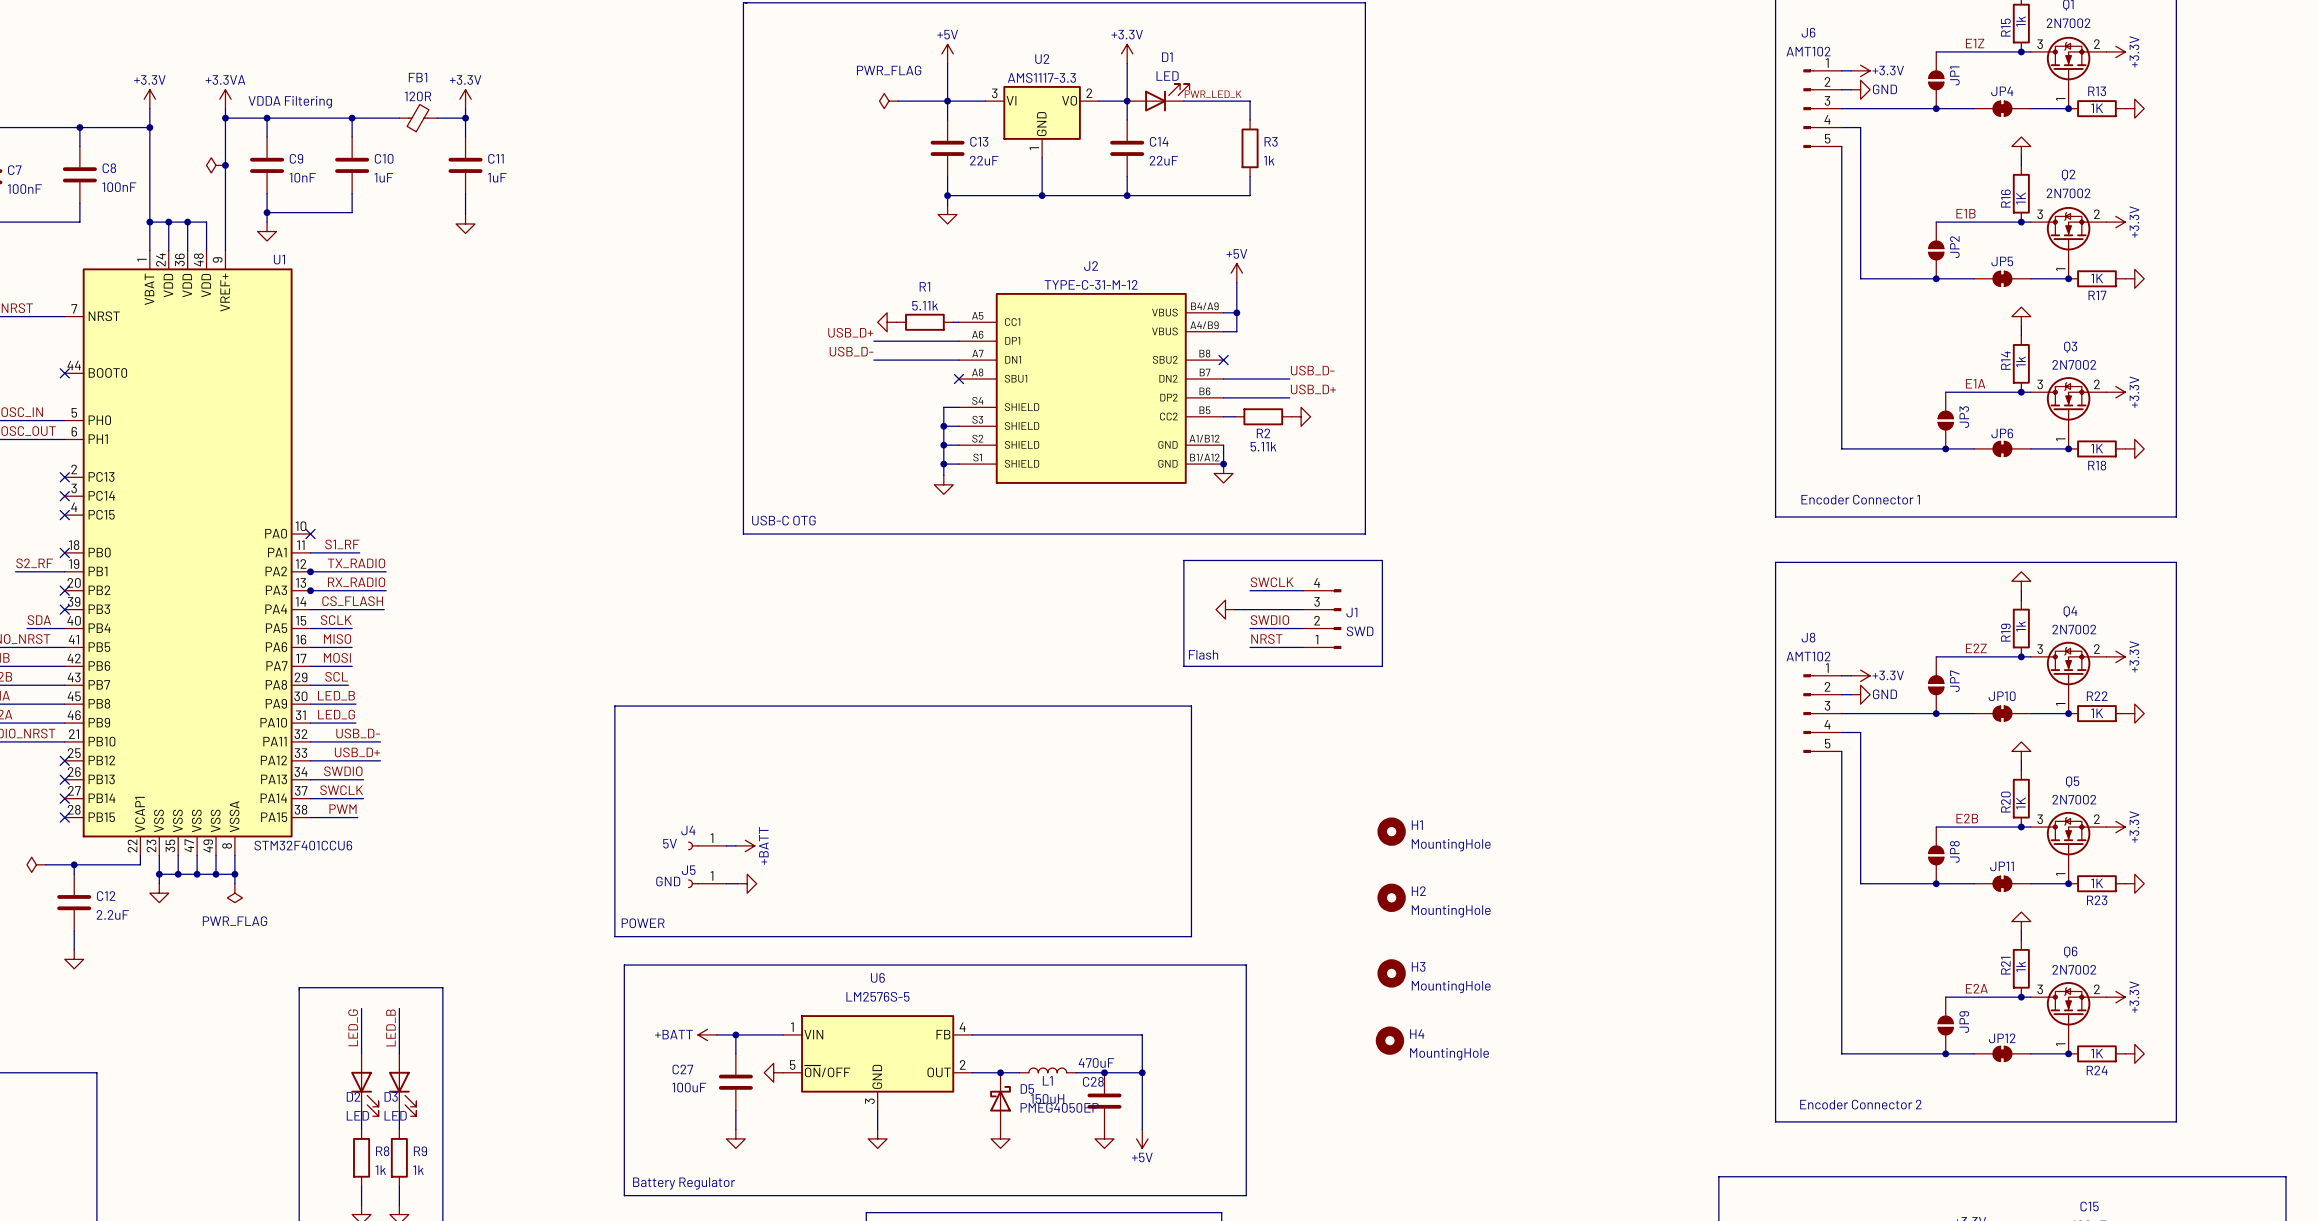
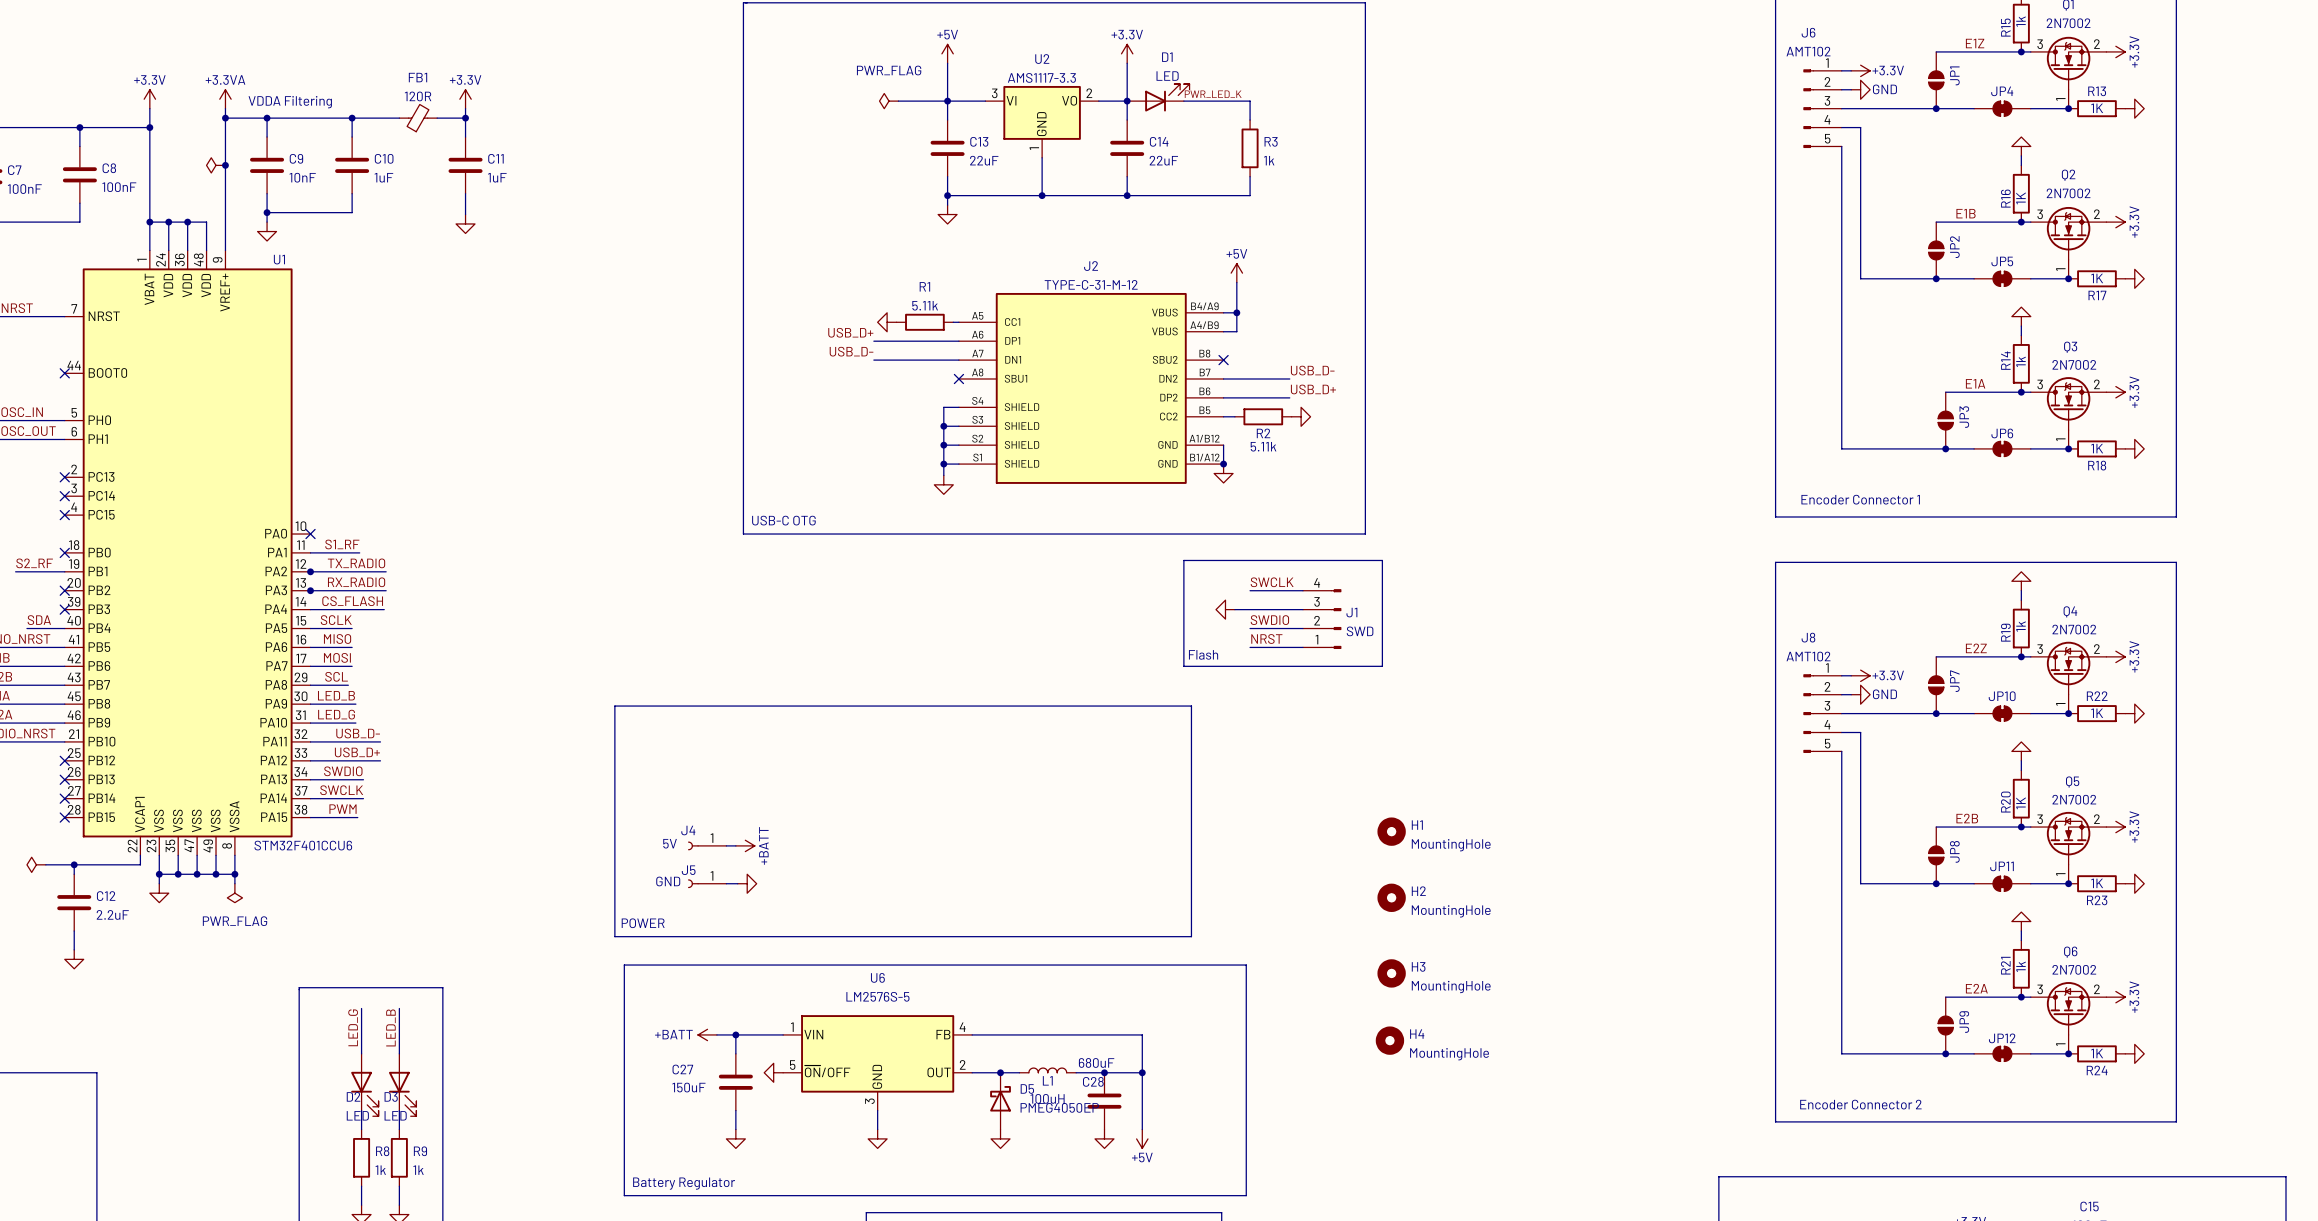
C28 value: 470uF (1096, 1062) -> 680uF (1096, 1062)
C27 value: 100uF (689, 1087) -> 150uF (688, 1087)
L1 value: 150uH (1047, 1098) -> 100uH (1047, 1098)

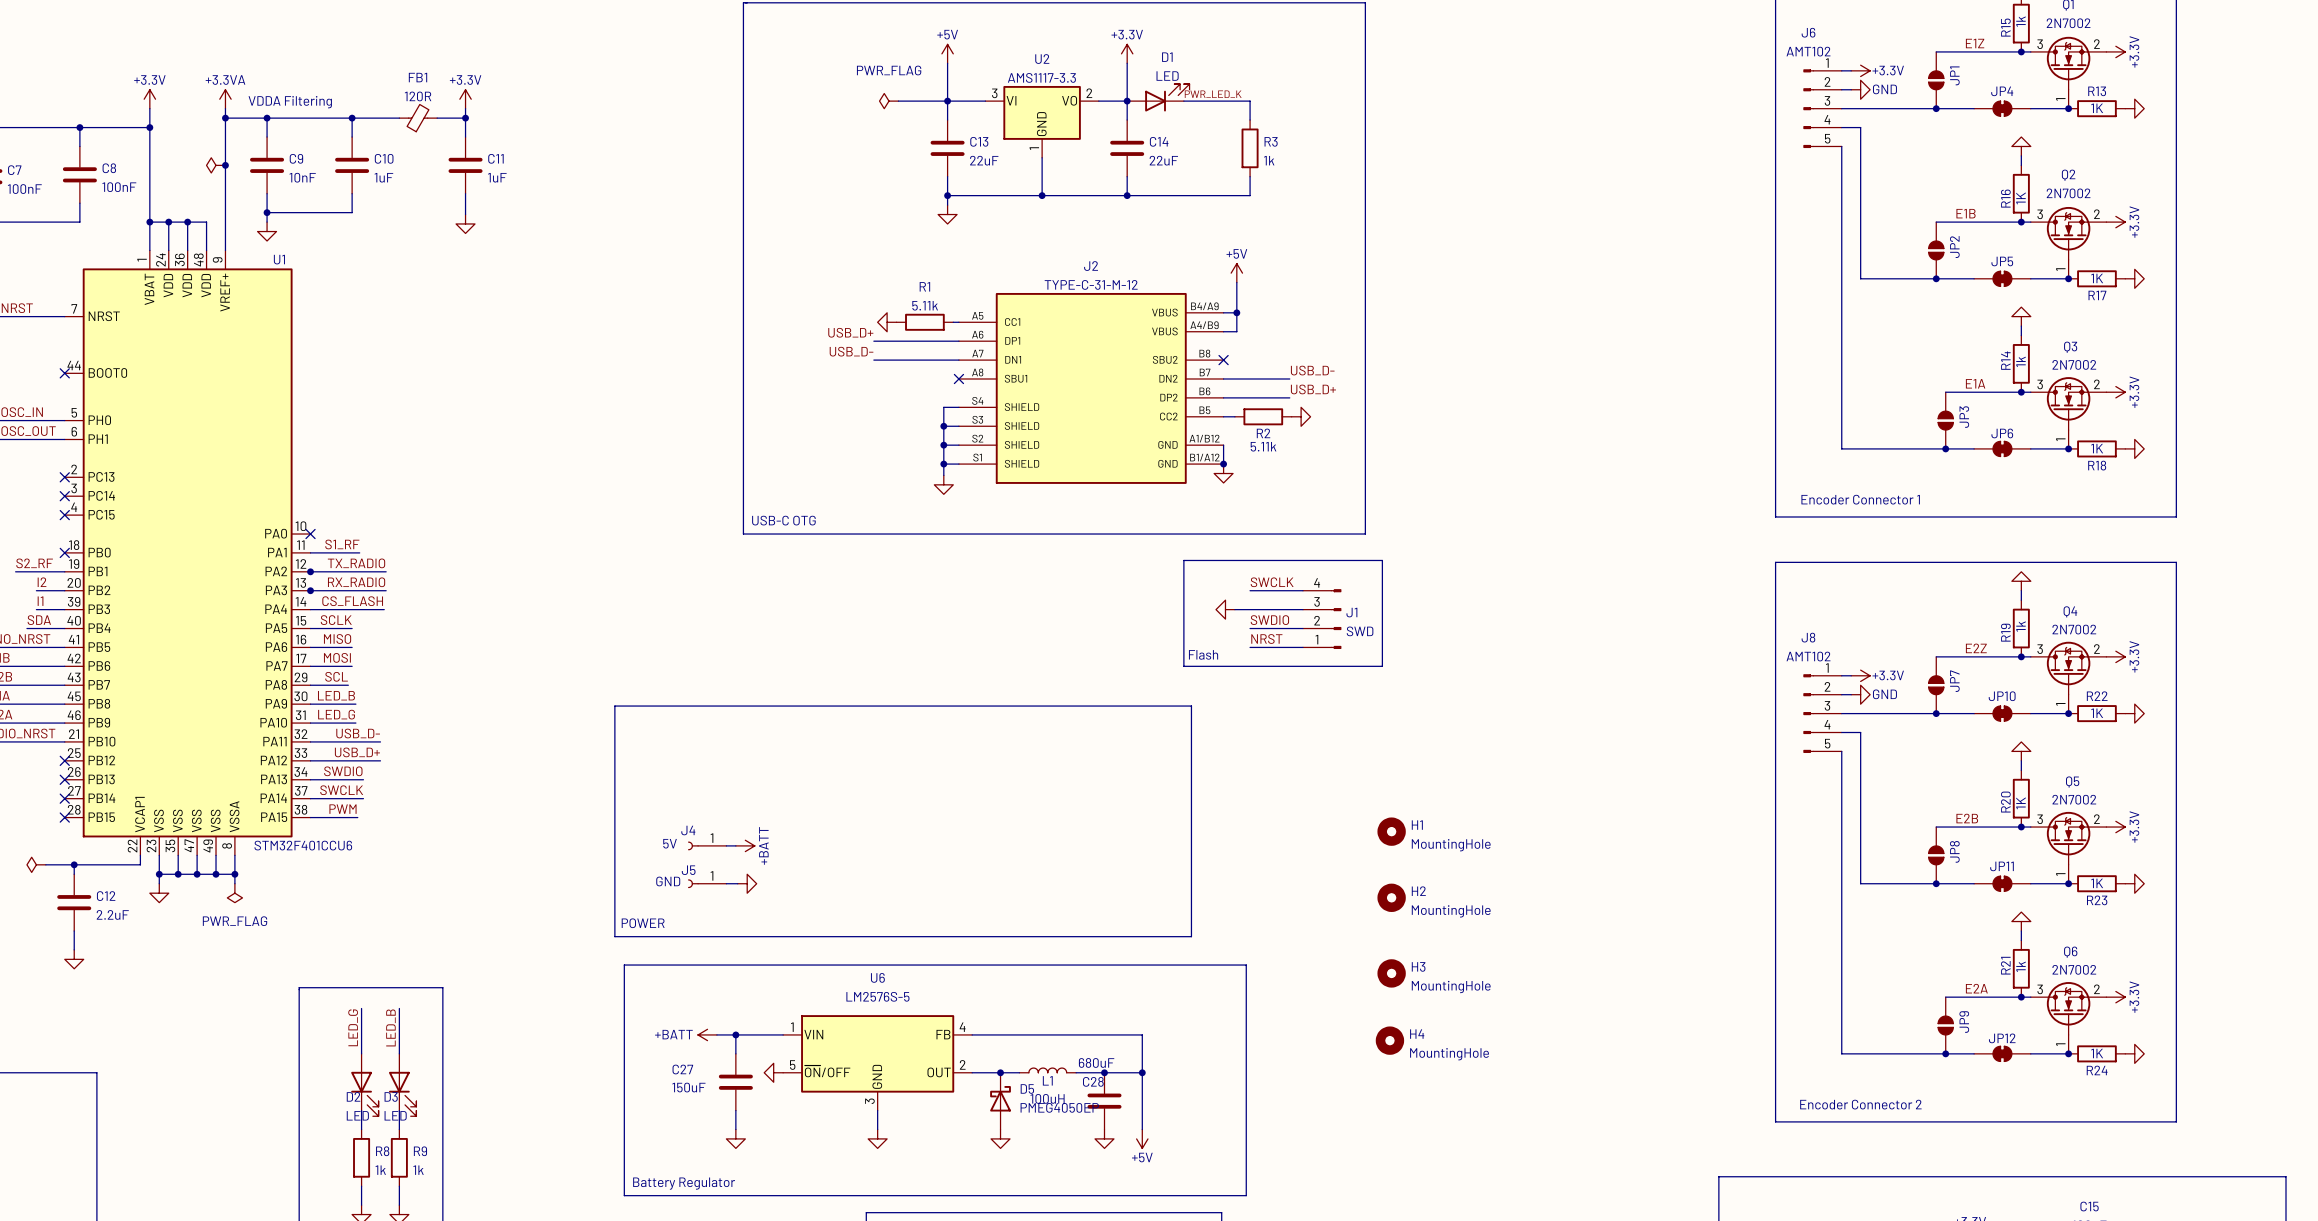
label: none -> I2 (42, 582)
wire: none -> (36, 590) (64, 590)
no-connect mark: (64, 590) -> none
label: none -> I1 (40, 601)
wire: none -> (36, 609) (64, 609)
no-connect mark: (64, 609) -> none

